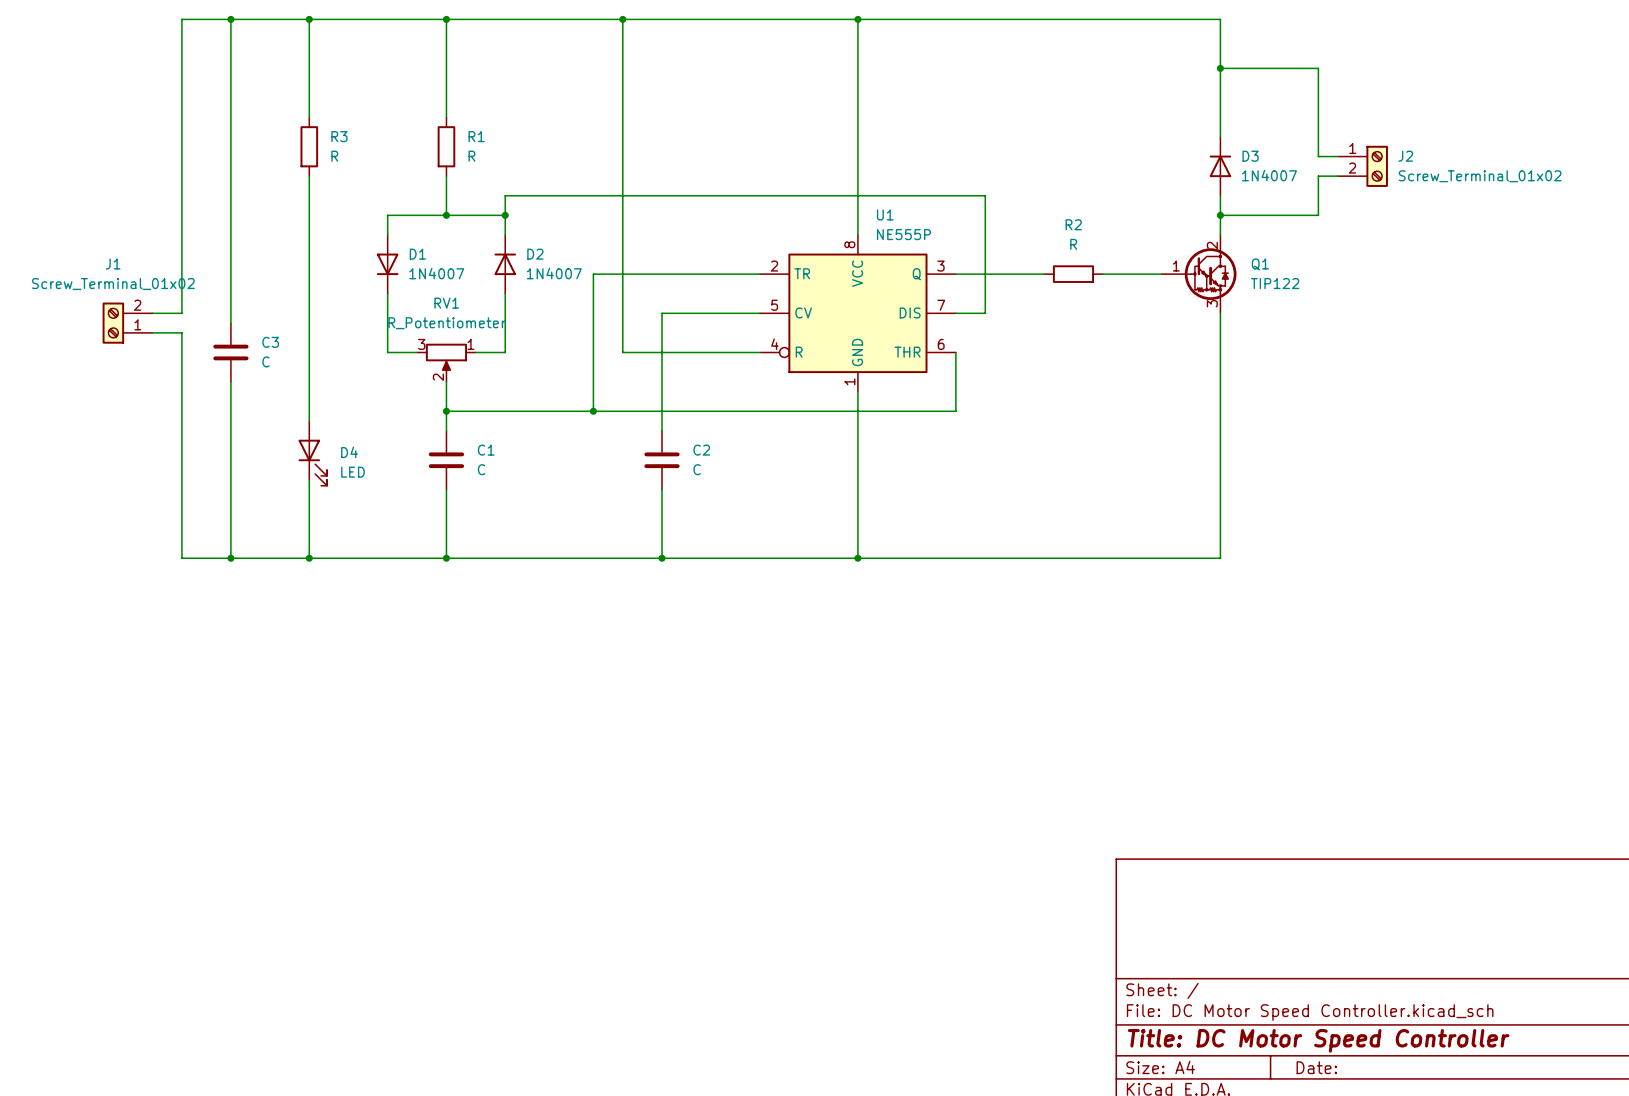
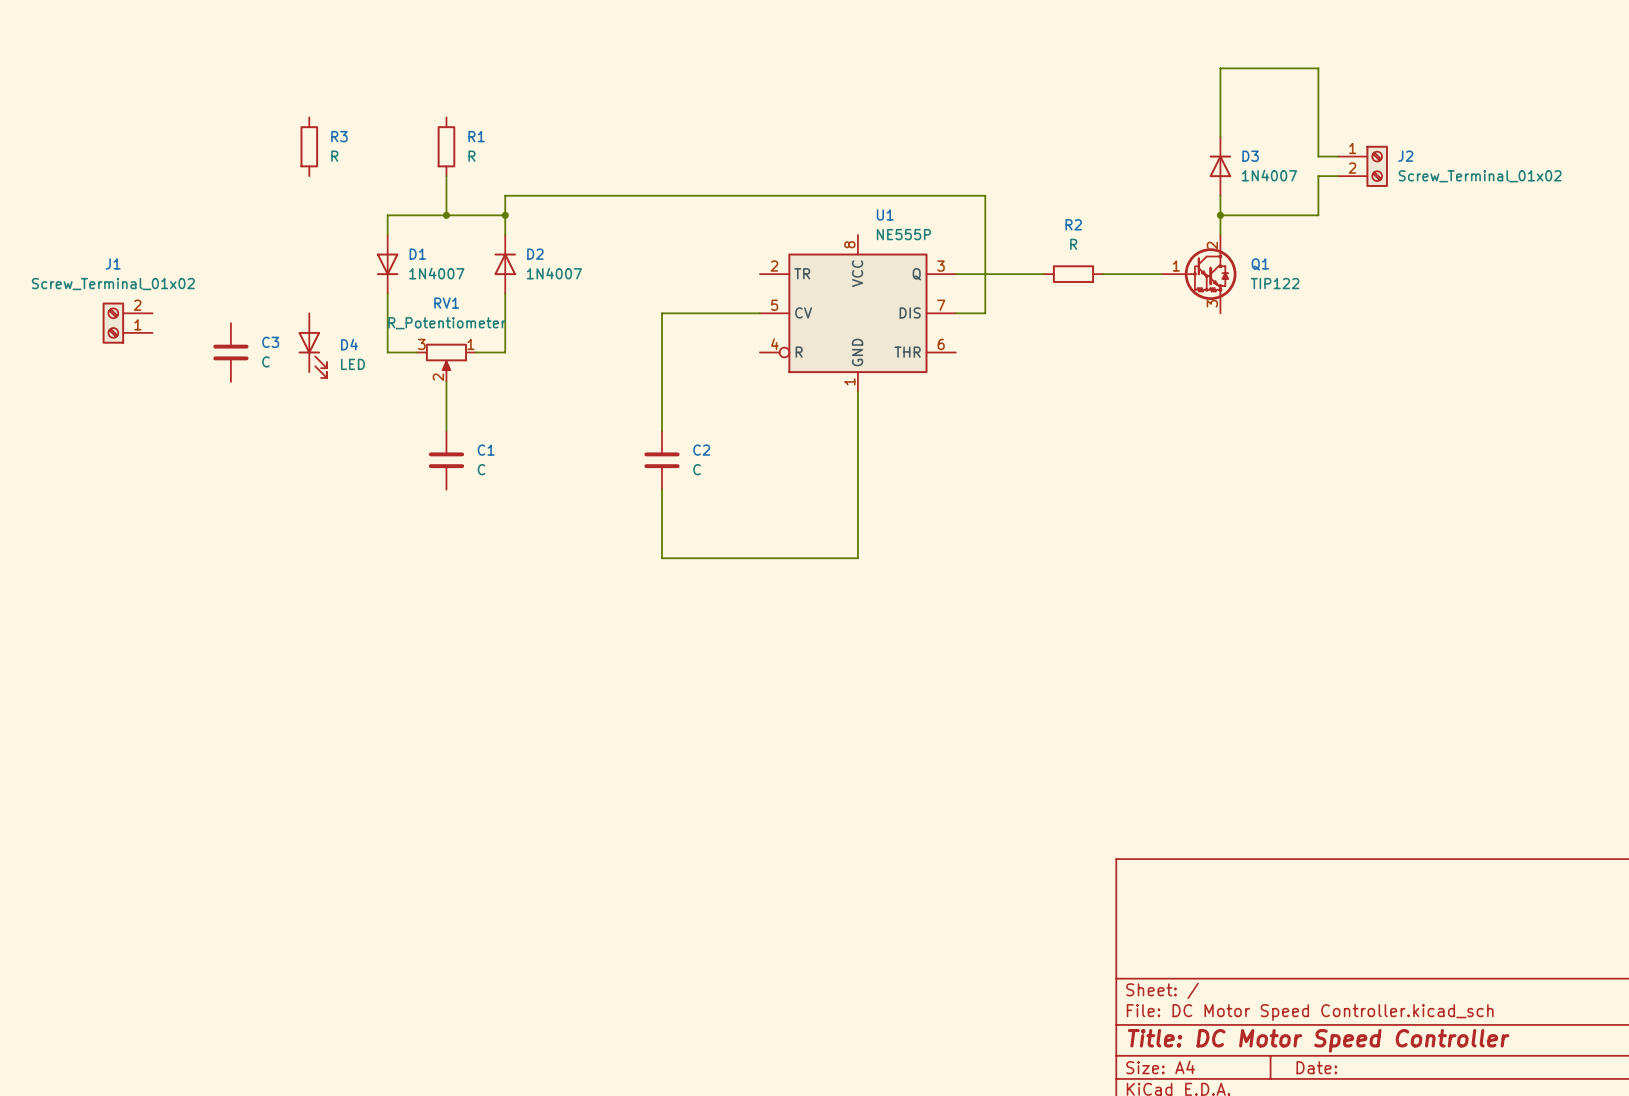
wire: (230, 19) (230, 323) -> none
junction: (230, 19) -> none
wire: (309, 19) (309, 117) -> none
junction: (309, 19) -> none
wire: (446, 19) (446, 117) -> none
junction: (446, 19) -> none
wire: (622, 19) (622, 352) (759, 352) -> none
junction: (622, 19) -> none
wire: (857, 19) (857, 234) -> none
junction: (857, 19) -> none
wire: (1220, 68) (1220, 19) (181, 19) (181, 313) (152, 313) -> none
junction: (1220, 68) -> none
wire: (309, 176) (309, 421) -> none
wire: (759, 274) (593, 274) (593, 411) -> none
wire: (1220, 313) (1220, 558) (857, 558) -> none
wire: (152, 332) (181, 332) (181, 558) (661, 558) -> none
wire: (955, 352) (955, 411) (446, 411) -> none
wire: (230, 381) (230, 558) -> none
junction: (446, 411) -> none
junction: (593, 411) -> none
D4 position: (312, 453) -> (312, 345)
wire: (309, 479) (309, 558) -> none
wire: (446, 489) (446, 558) -> none
junction: (230, 558) -> none
junction: (309, 558) -> none
junction: (446, 558) -> none
junction: (661, 558) -> none
junction: (857, 558) -> none

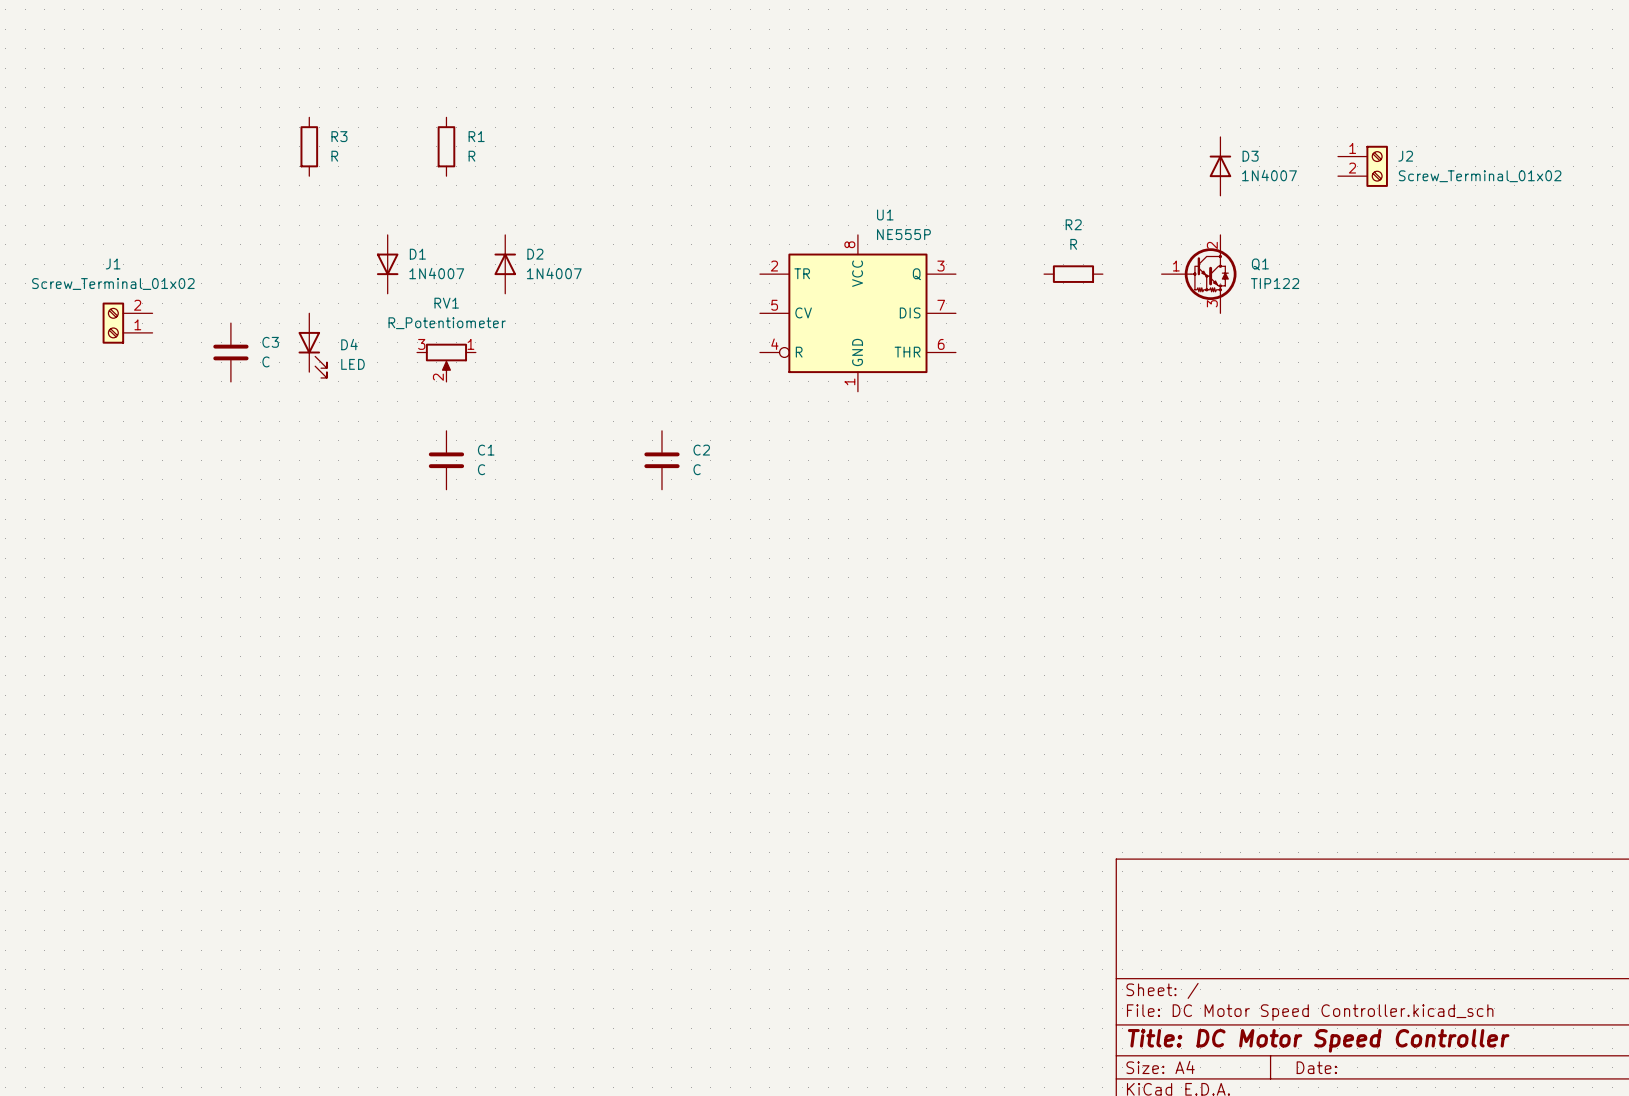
wire: (1220, 136) (1220, 68) (1318, 68) (1318, 156) (1337, 156) -> none
wire: (446, 176) (446, 215) -> none
wire: (1337, 176) (1318, 176) (1318, 215) (1220, 215) -> none
wire: (1220, 195) (1220, 234) -> none
junction: (446, 215) -> none
wire: (505, 215) (387, 215) (387, 234) -> none
junction: (505, 215) -> none
junction: (1220, 215) -> none
wire: (505, 234) (505, 195) (985, 195) (985, 313) (955, 313) -> none
wire: (955, 274) (1044, 274) -> none
wire: (1102, 274) (1161, 274) -> none
wire: (387, 293) (387, 352) (417, 352) -> none
wire: (505, 293) (505, 352) (475, 352) -> none
wire: (759, 313) (661, 313) (661, 430) -> none
wire: (446, 381) (446, 430) -> none
wire: (857, 391) (857, 558) (661, 558) (661, 489) -> none

